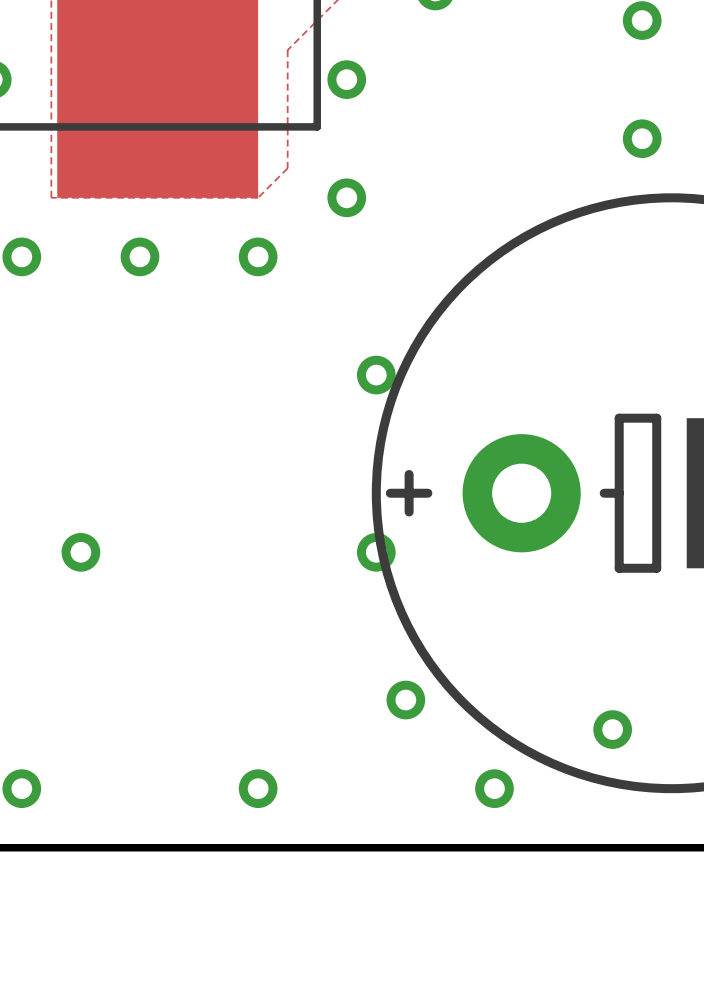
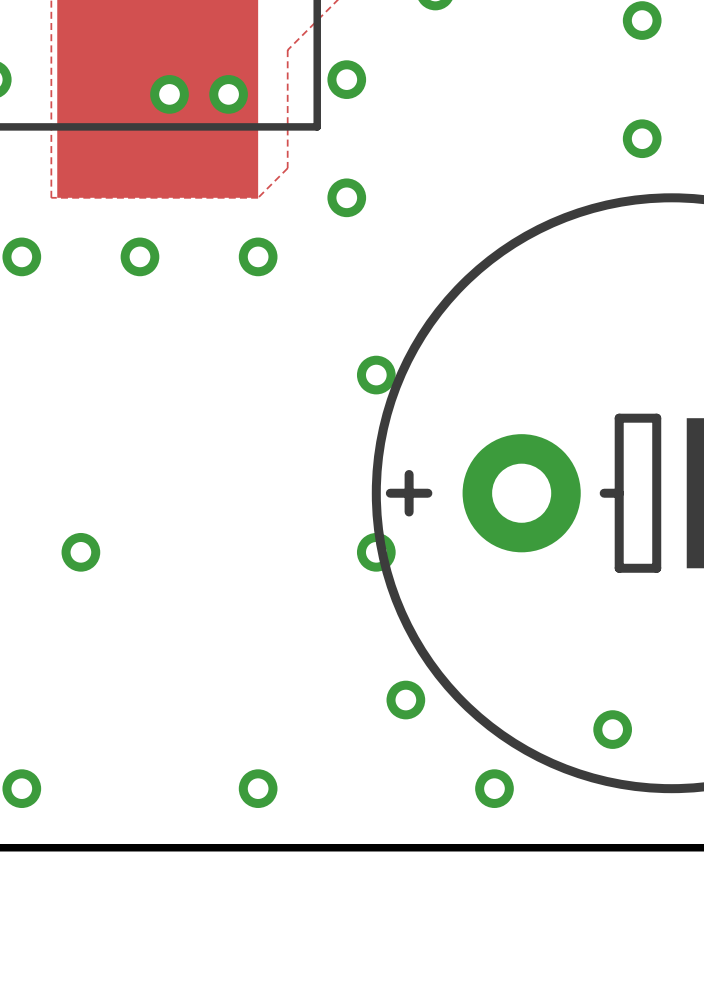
via: none -> (169, 94)
via: none -> (228, 94)

